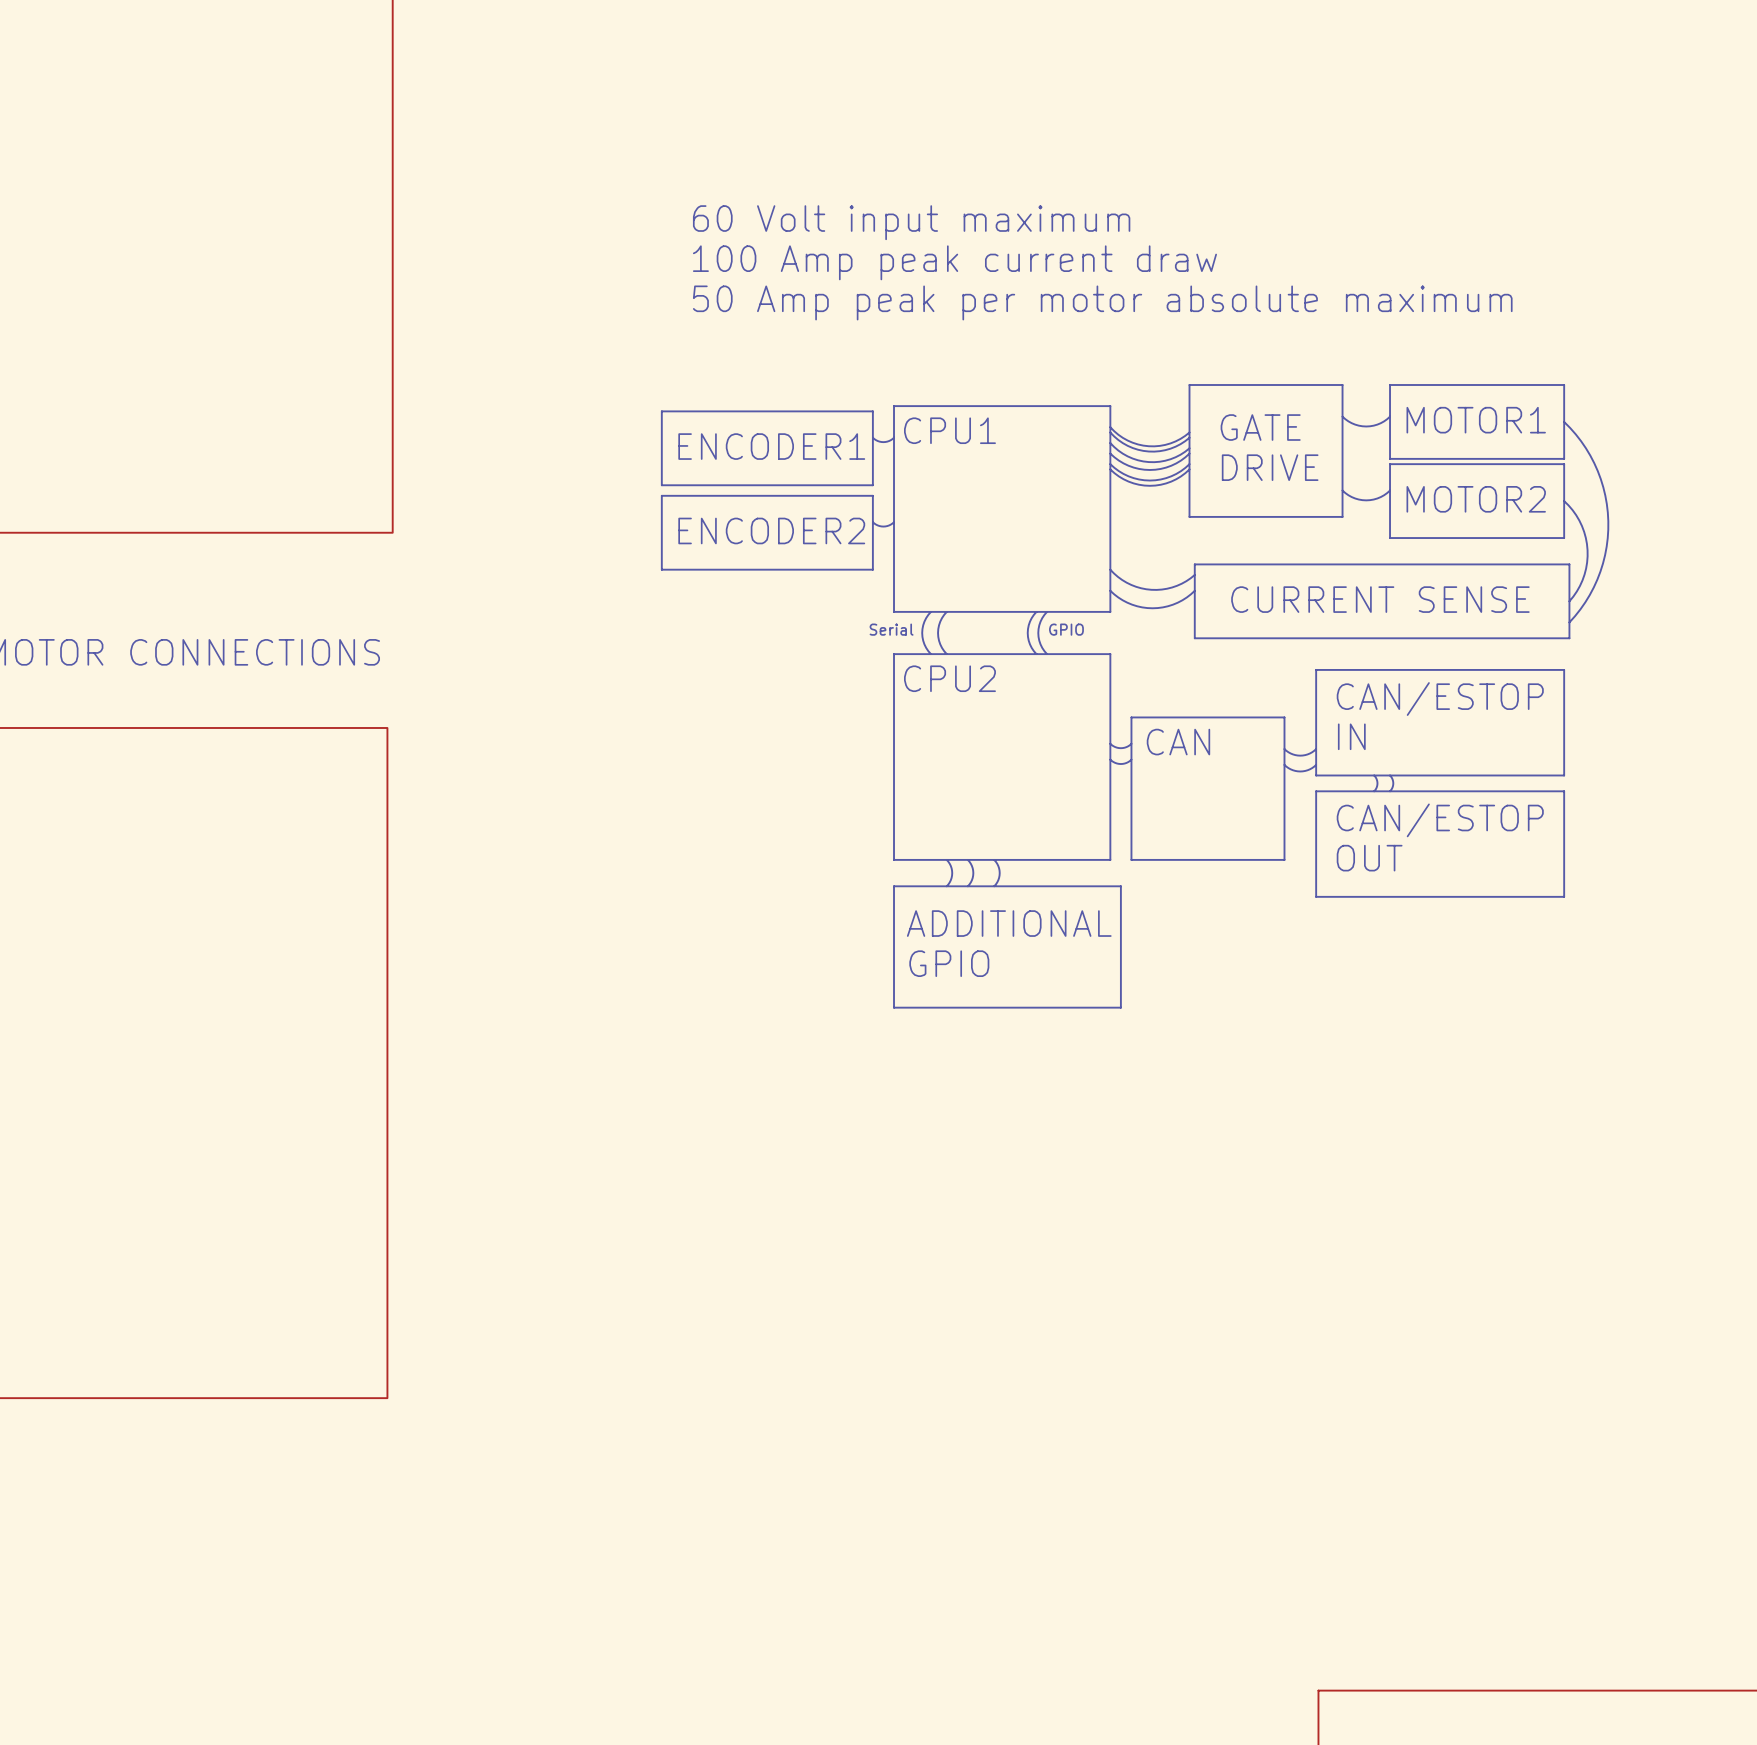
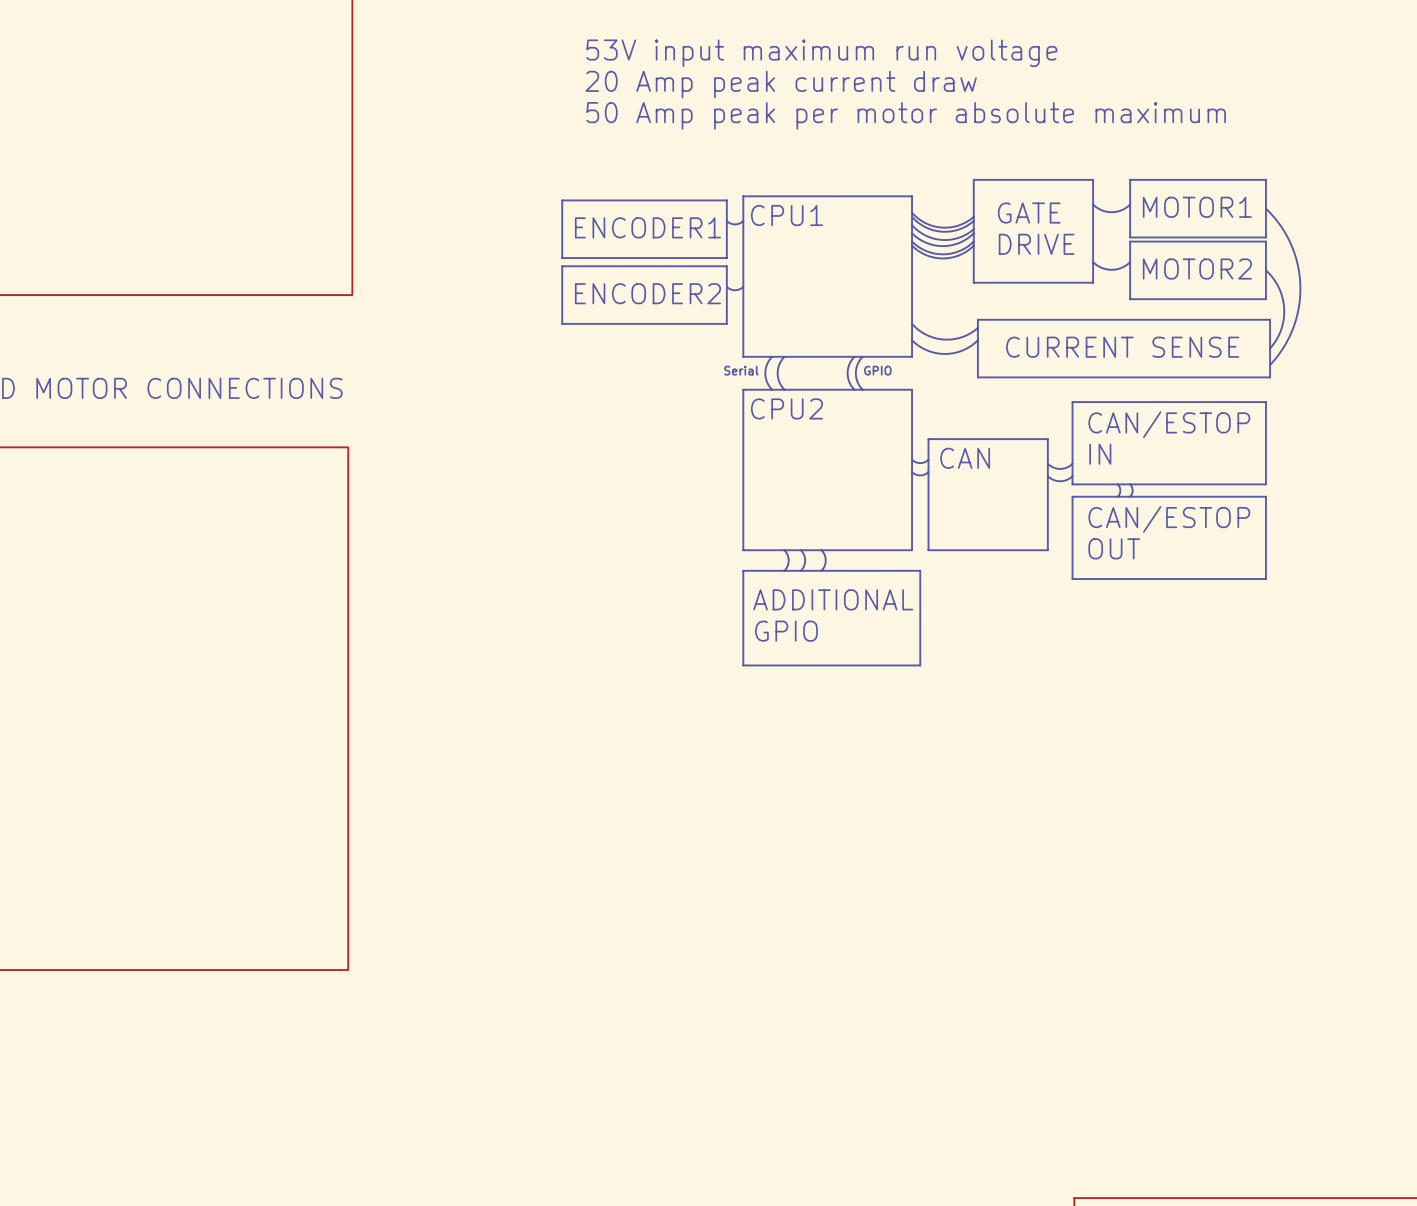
text: 60 Volt input maximum (911, 222) -> 53V input maximum run voltage (821, 53)
text: 100 Amp peak current draw (954, 262) -> 20 Amp peak current draw (781, 84)

